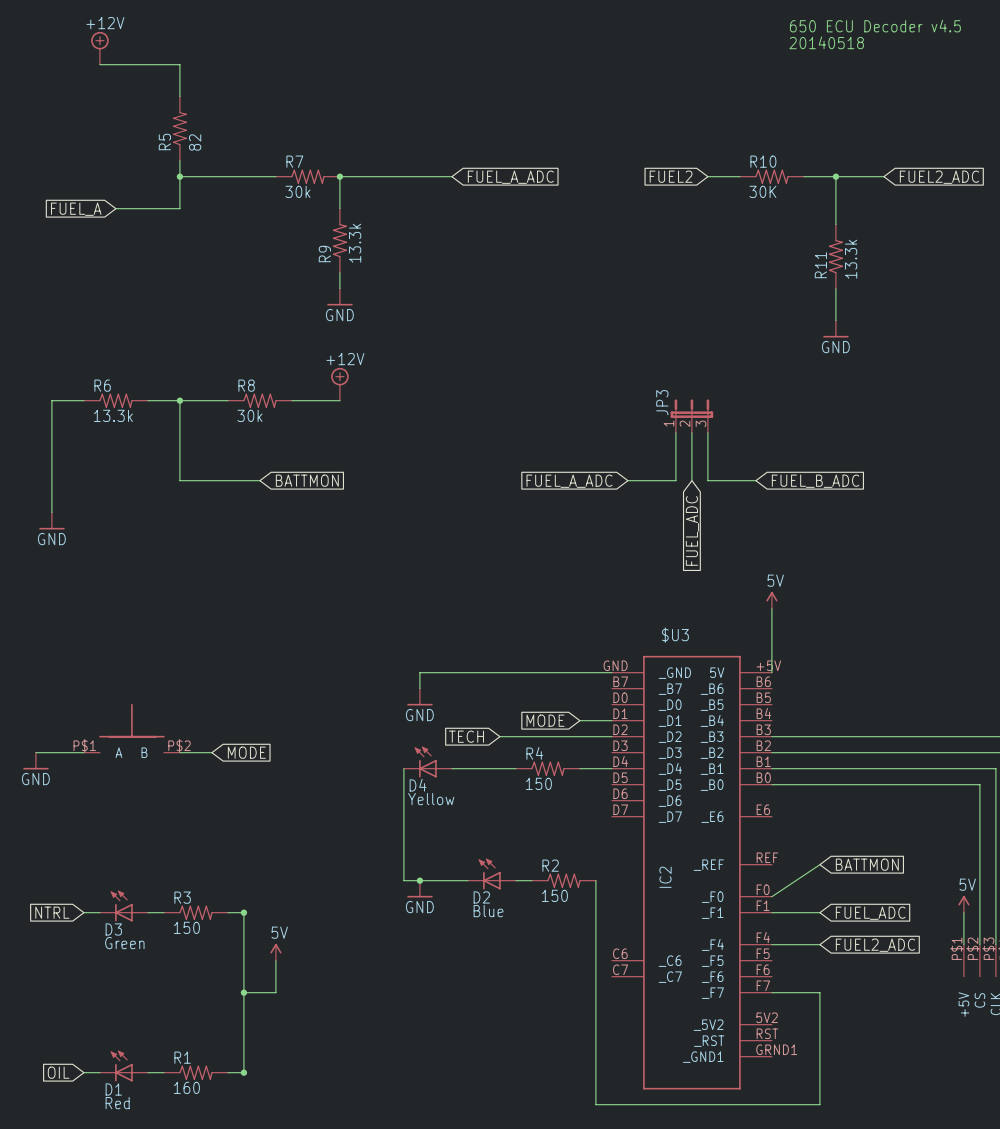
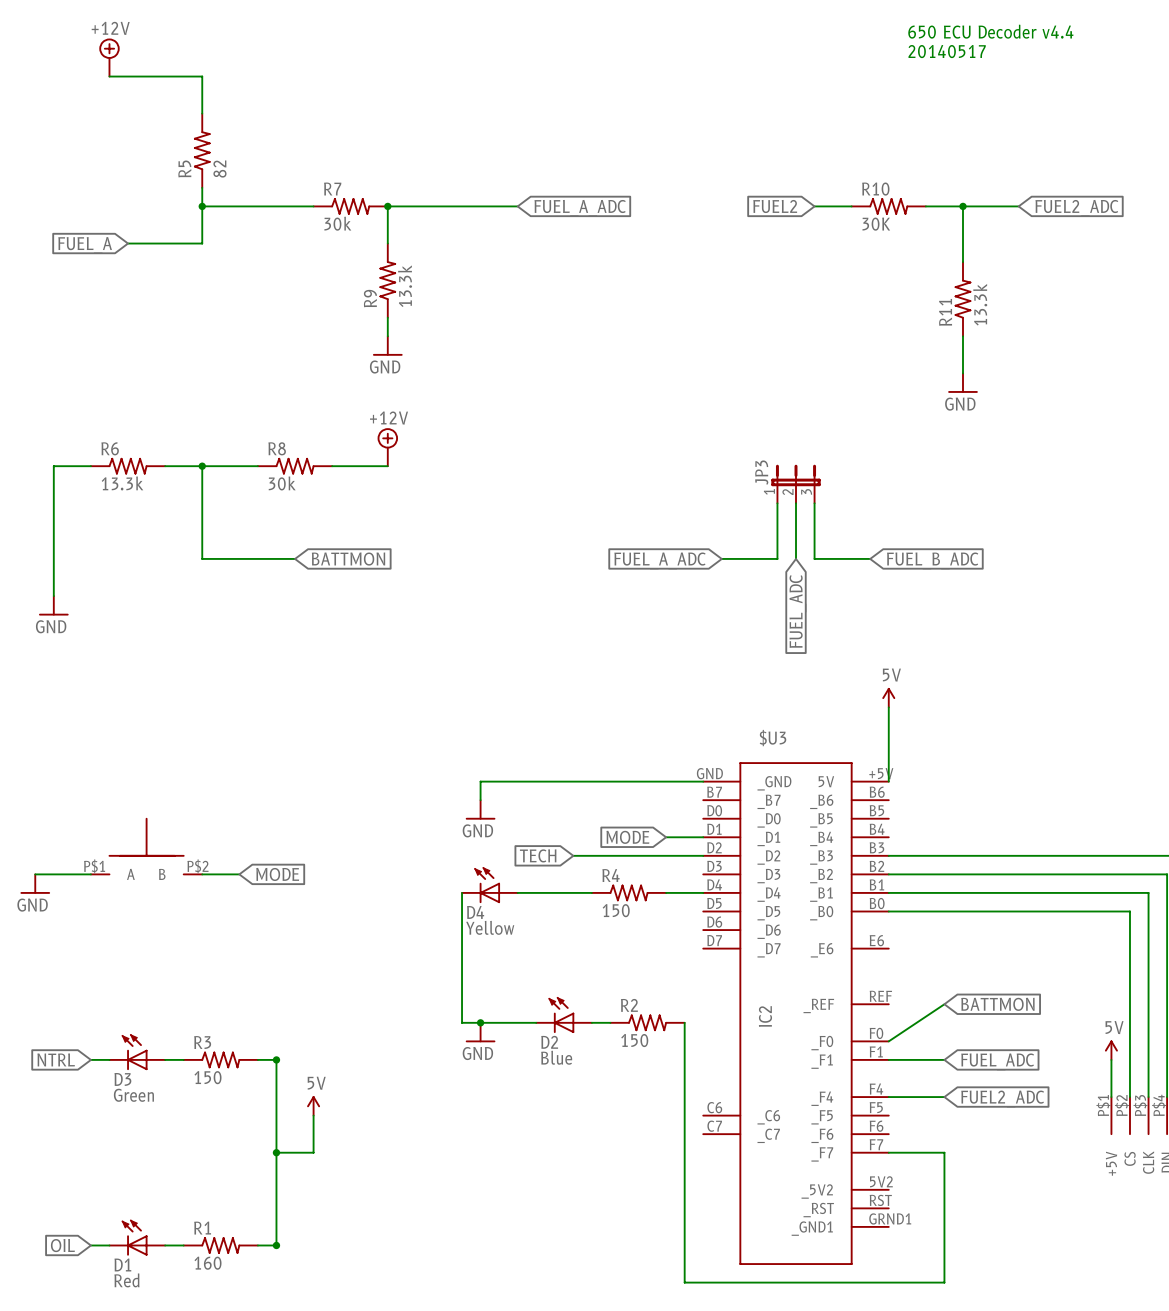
text: 650 ECU Decoder v4.5 (875, 26) -> 650 ECU Decoder v4.4 (990, 31)
text: 20140518 (826, 42) -> 20140517 (947, 51)

